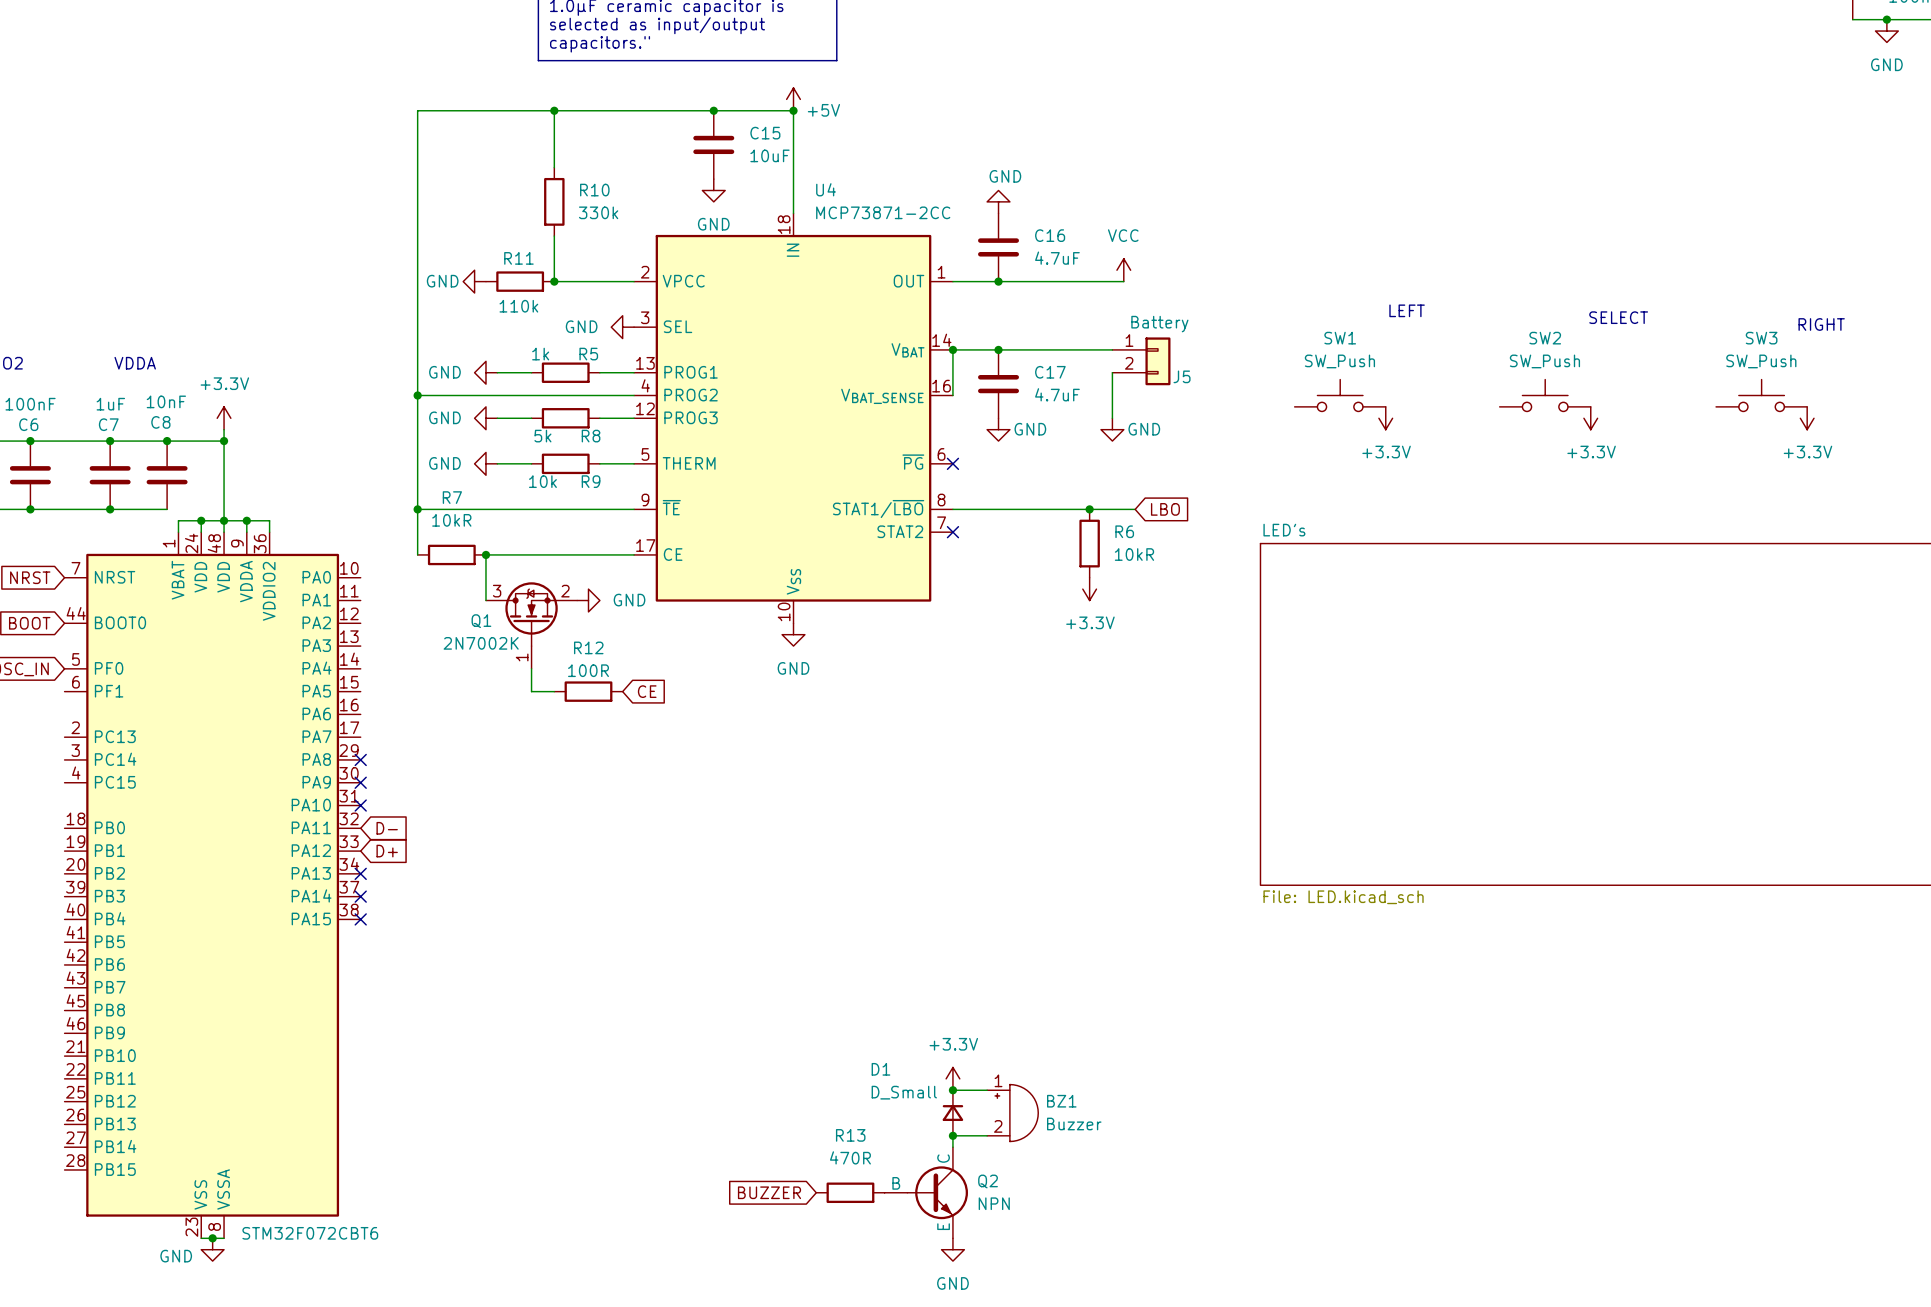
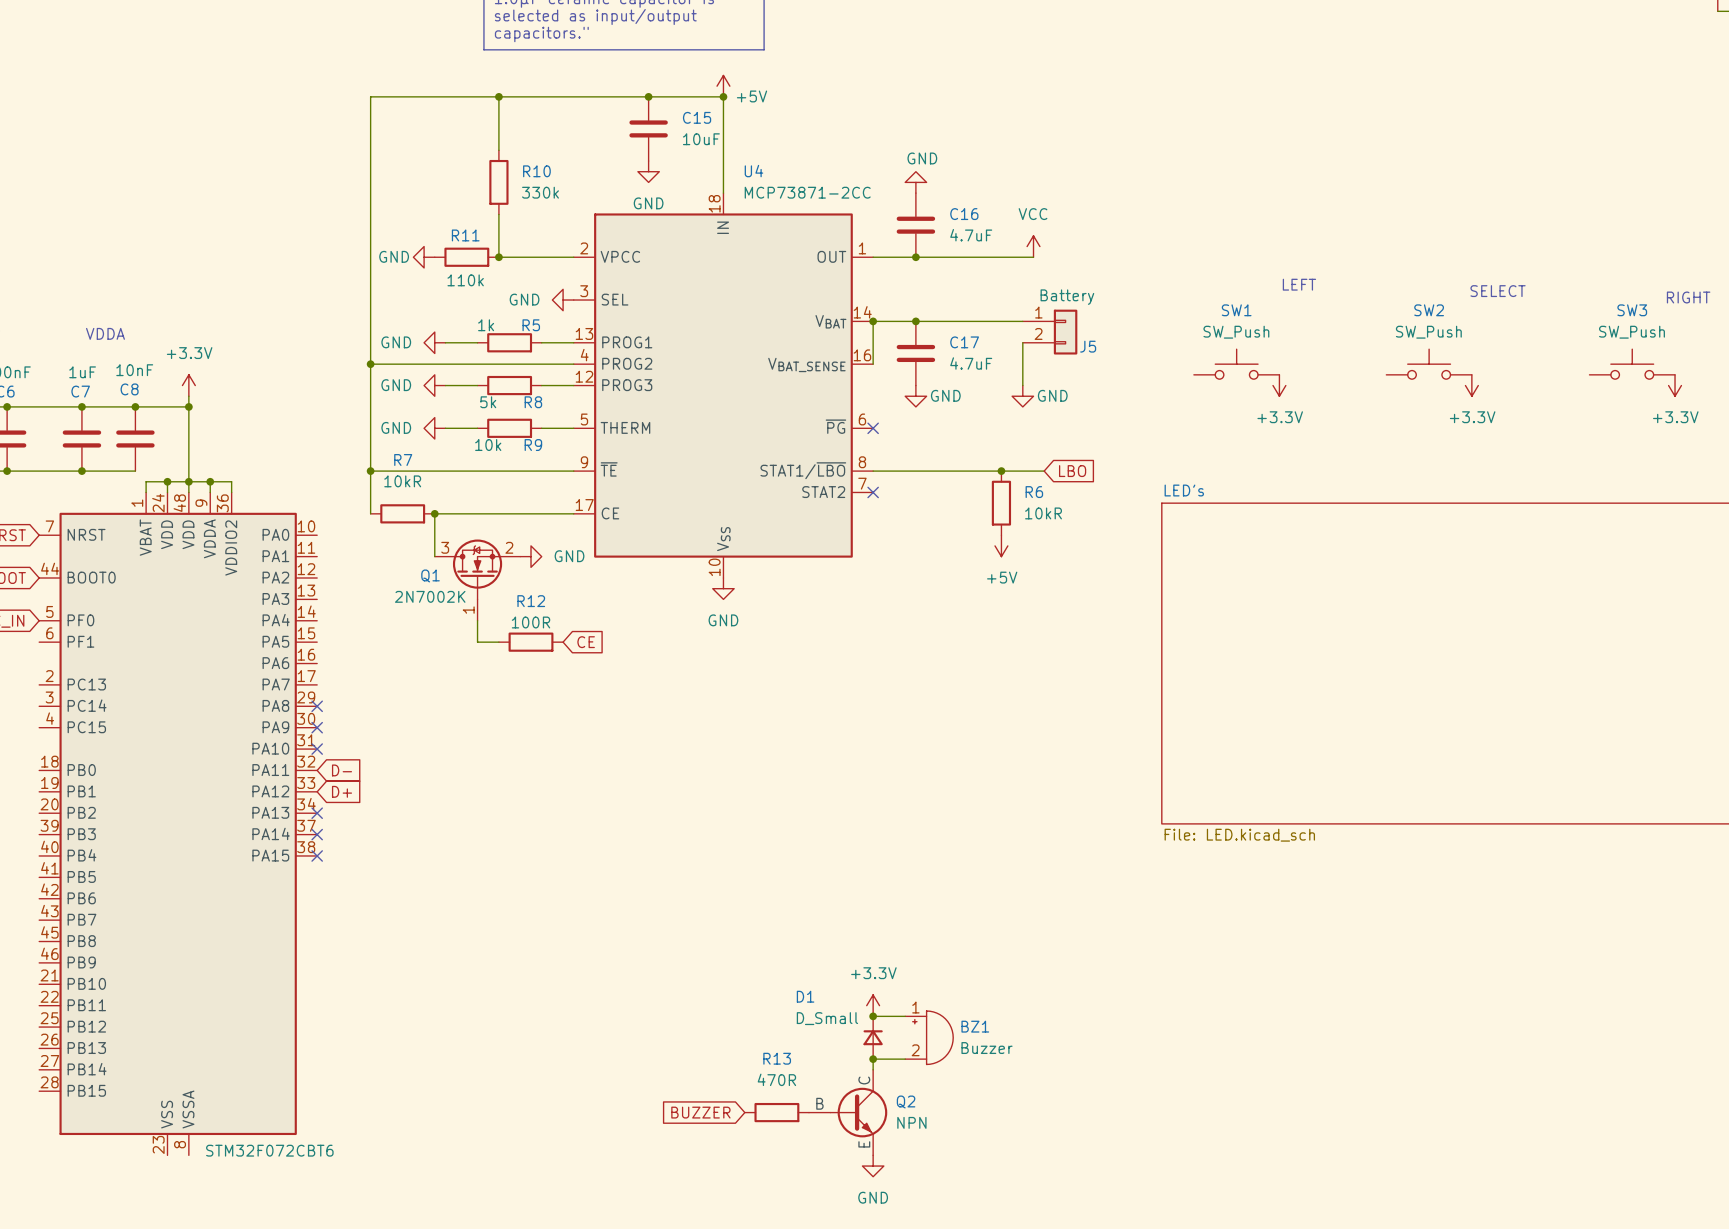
power symbol: +3.3V (1089, 589) -> +5V (1001, 545)
wire: (201, 1238) (224, 1238) -> none
junction: (212, 1238) -> none
power symbol: GND (212, 1249) -> none

